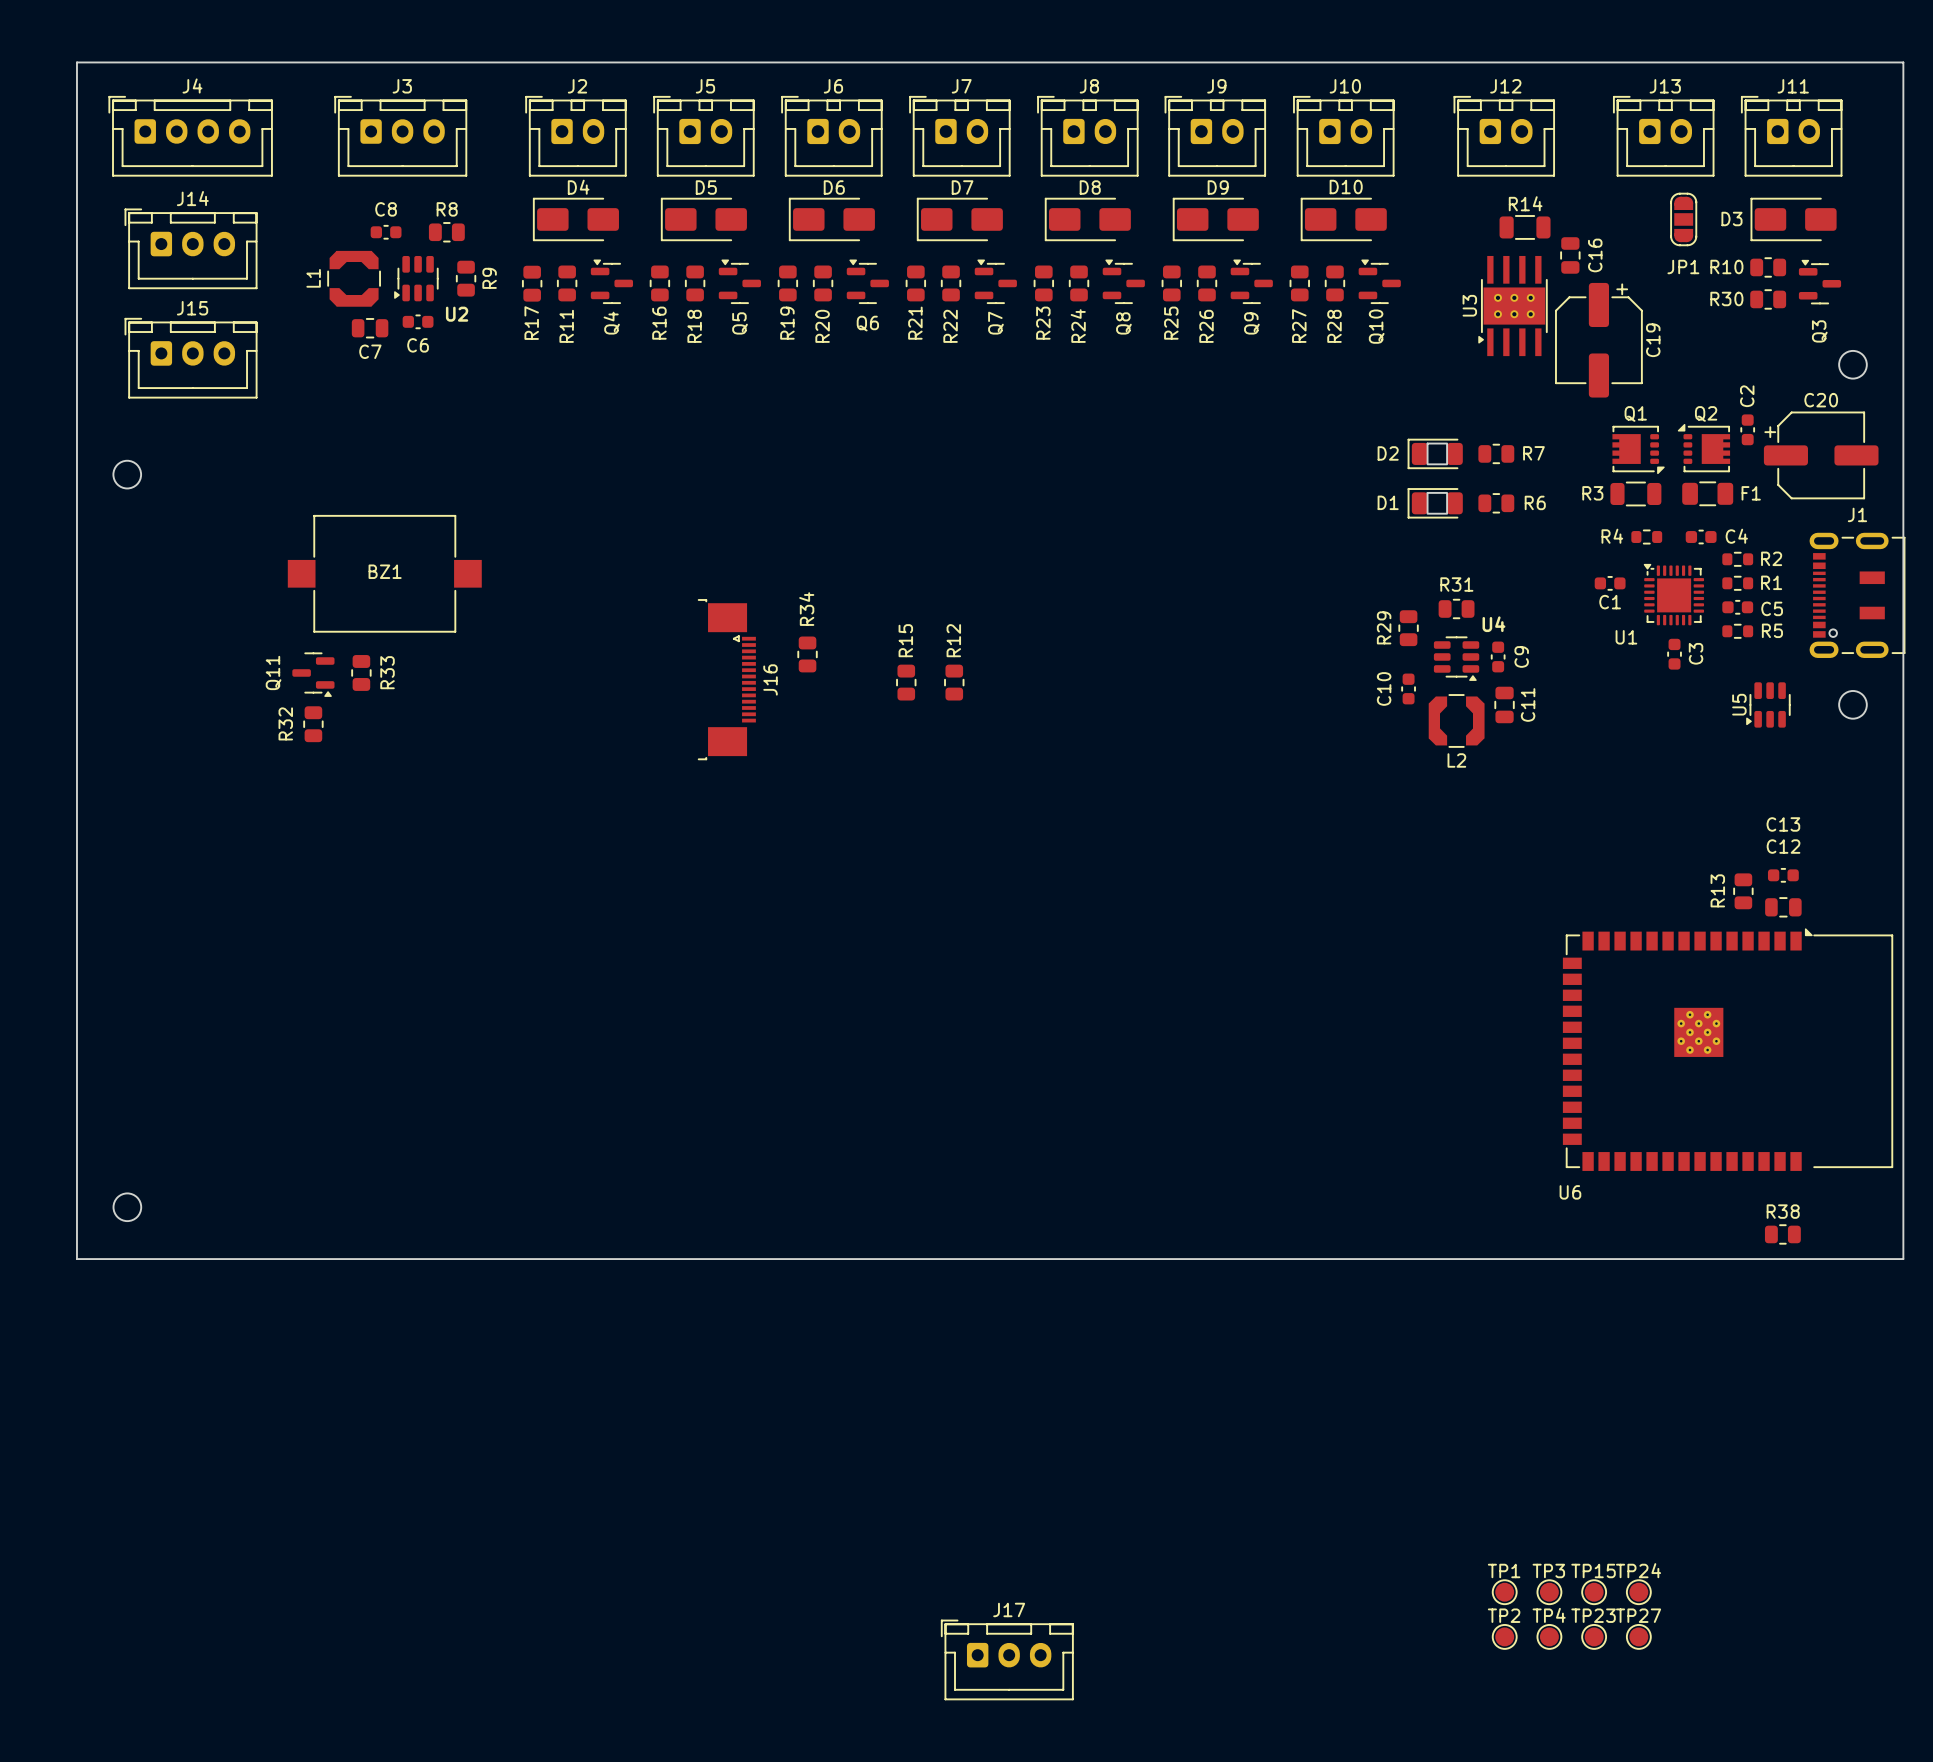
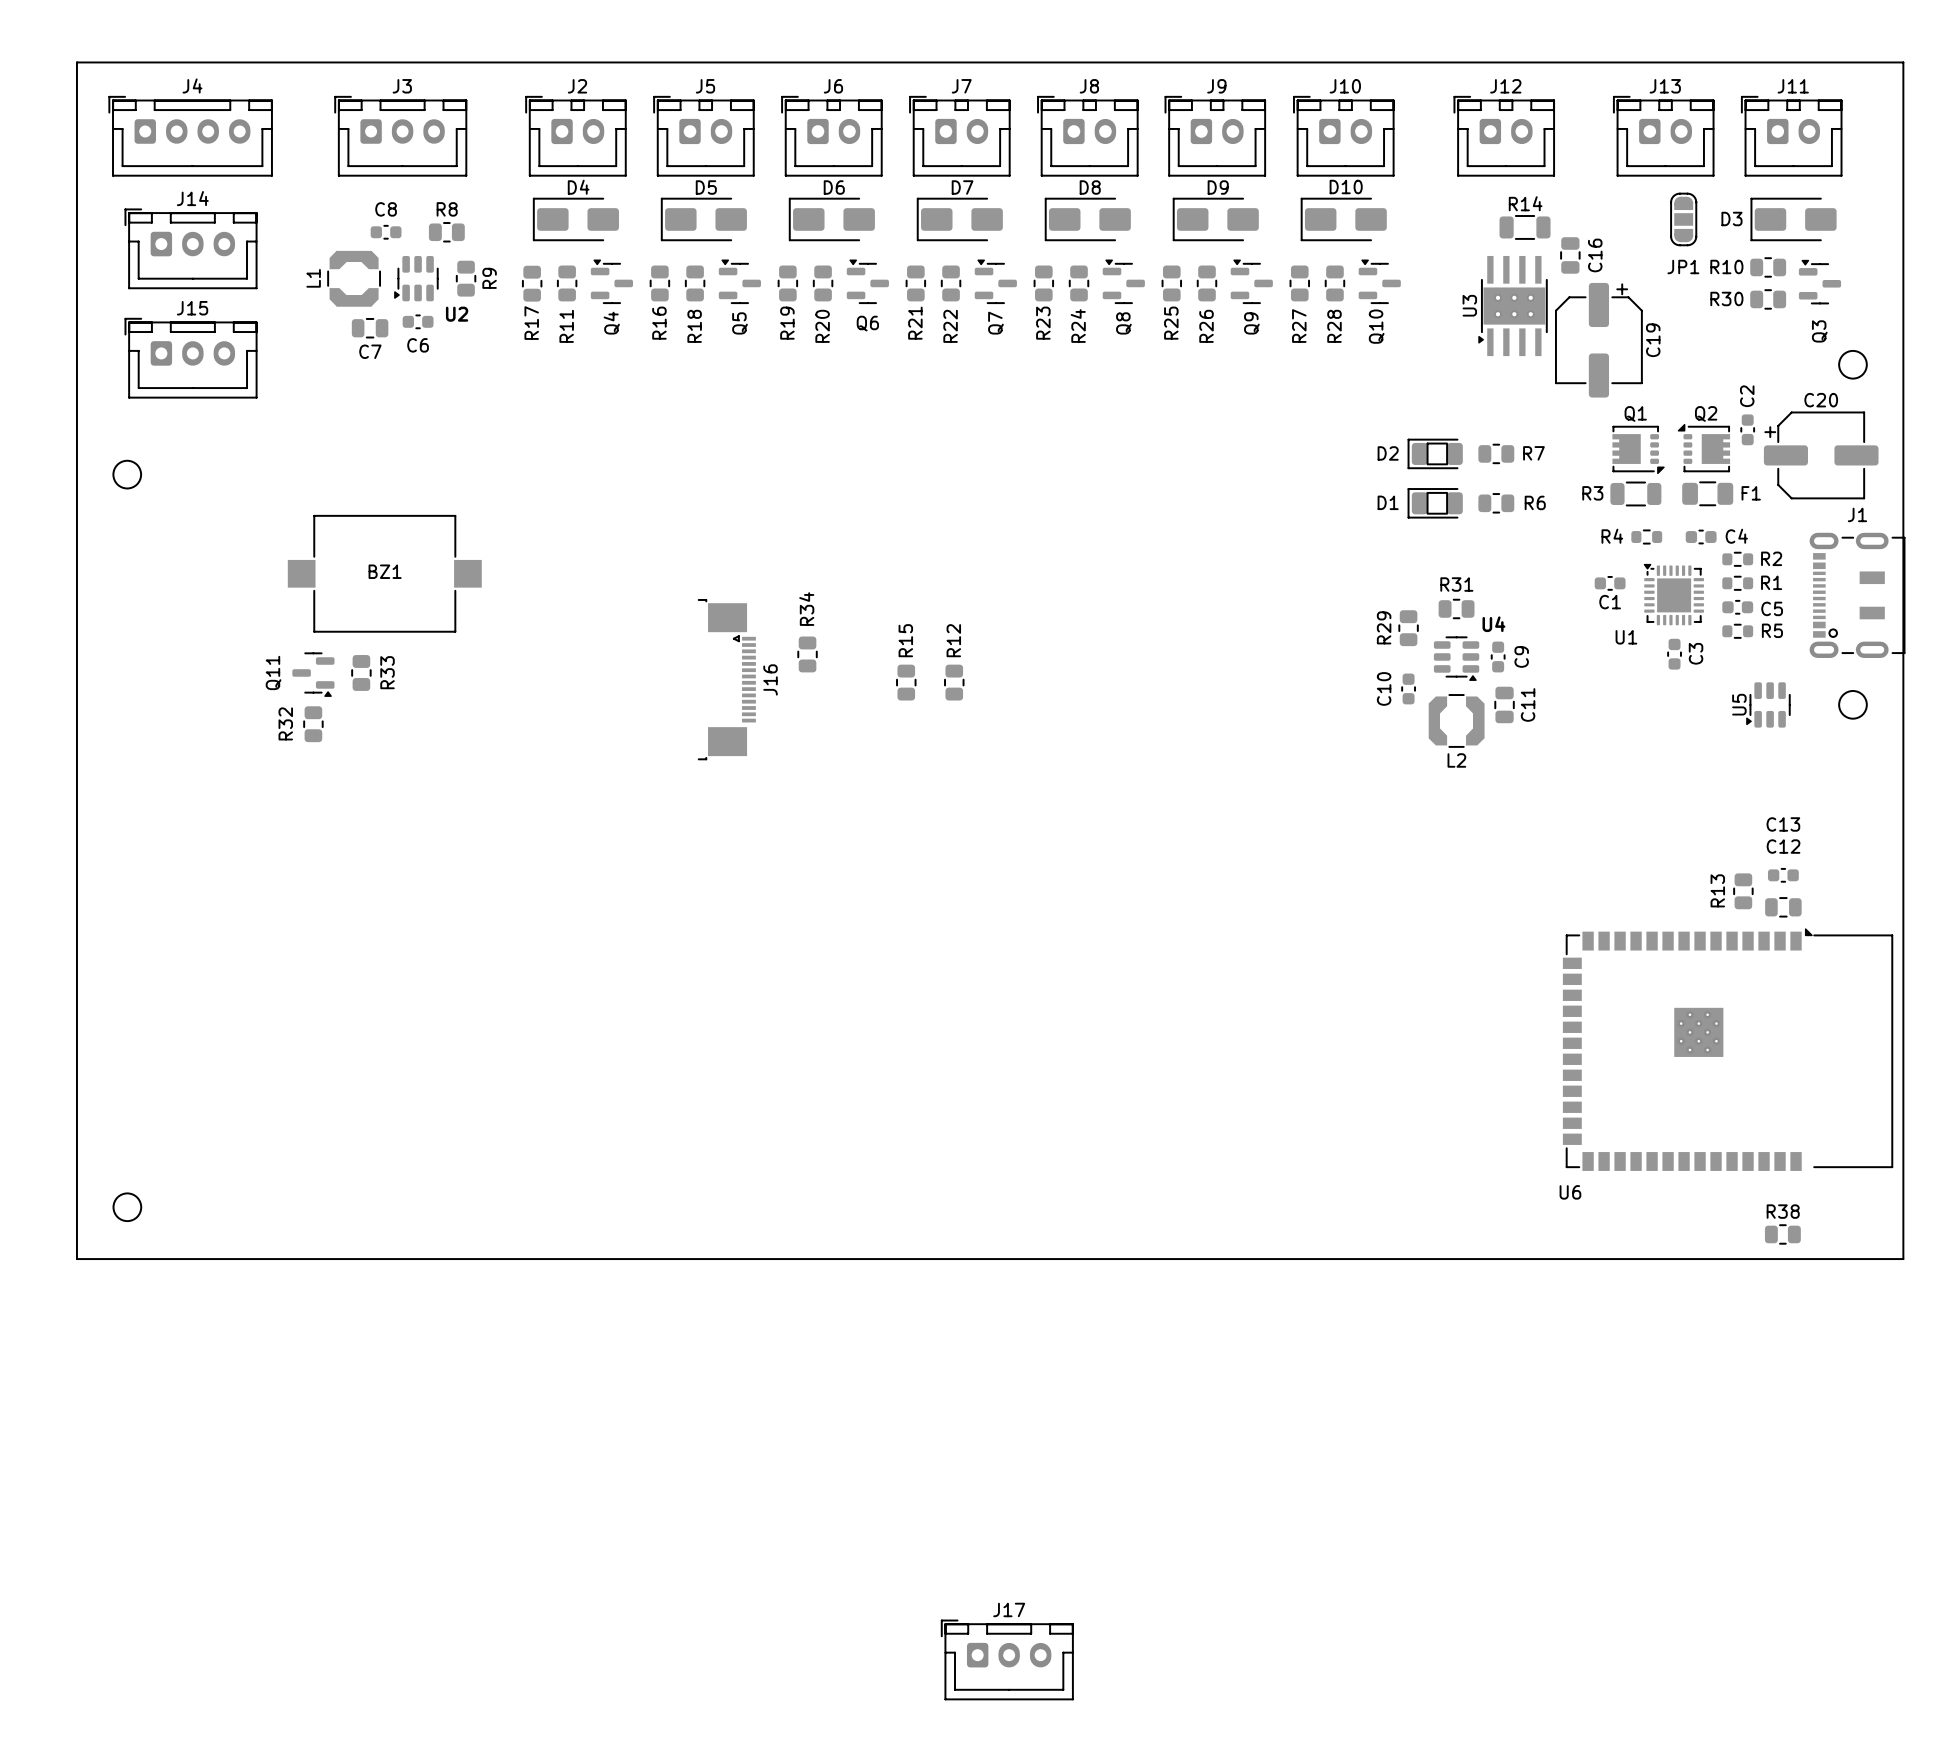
TP1: (1504, 1592) -> none
TP3: (1549, 1592) -> none
TP15: (1594, 1592) -> none
TP24: (1638, 1592) -> none
TP2: (1504, 1636) -> none
TP4: (1549, 1636) -> none
TP23: (1594, 1636) -> none
TP27: (1638, 1636) -> none

